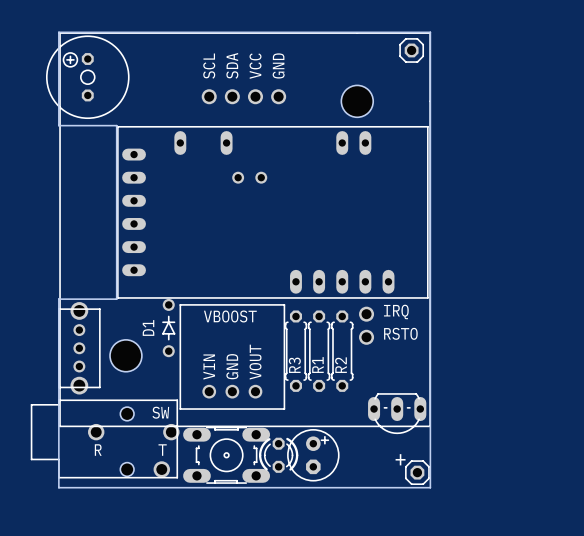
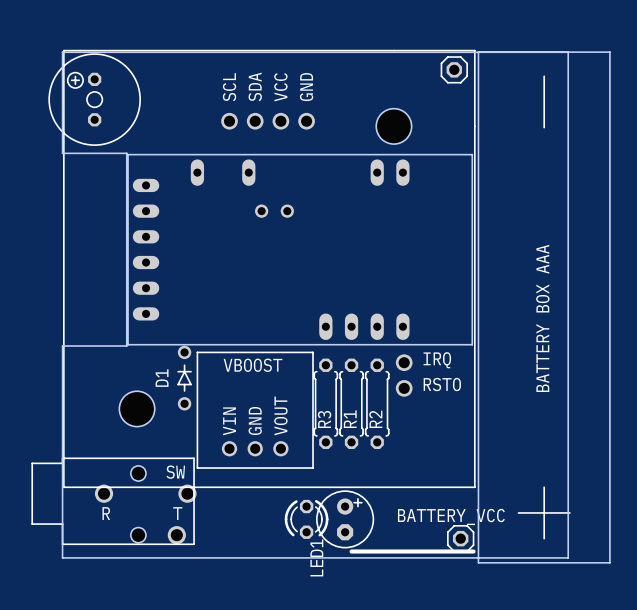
drawing: none -> [477, 51, 611, 564]
board edge: (58, 34) (58, 32) (430, 32) (430, 487) (58, 487) -> (62, 52) (568, 52) (568, 557) (62, 557) (62, 555)
part footprint: [117, 126, 429, 299] -> [127, 153, 473, 346]
part: (79, 348) -> none
part: (397, 413) -> none
BATTERY_VCC name: none -> BATTERY_VCC (451, 516)
part: (226, 455) -> none
text: + (400, 459) -> none
line: none -> (351, 551) (473, 551)
LED1 name: none -> LED1 (316, 557)

